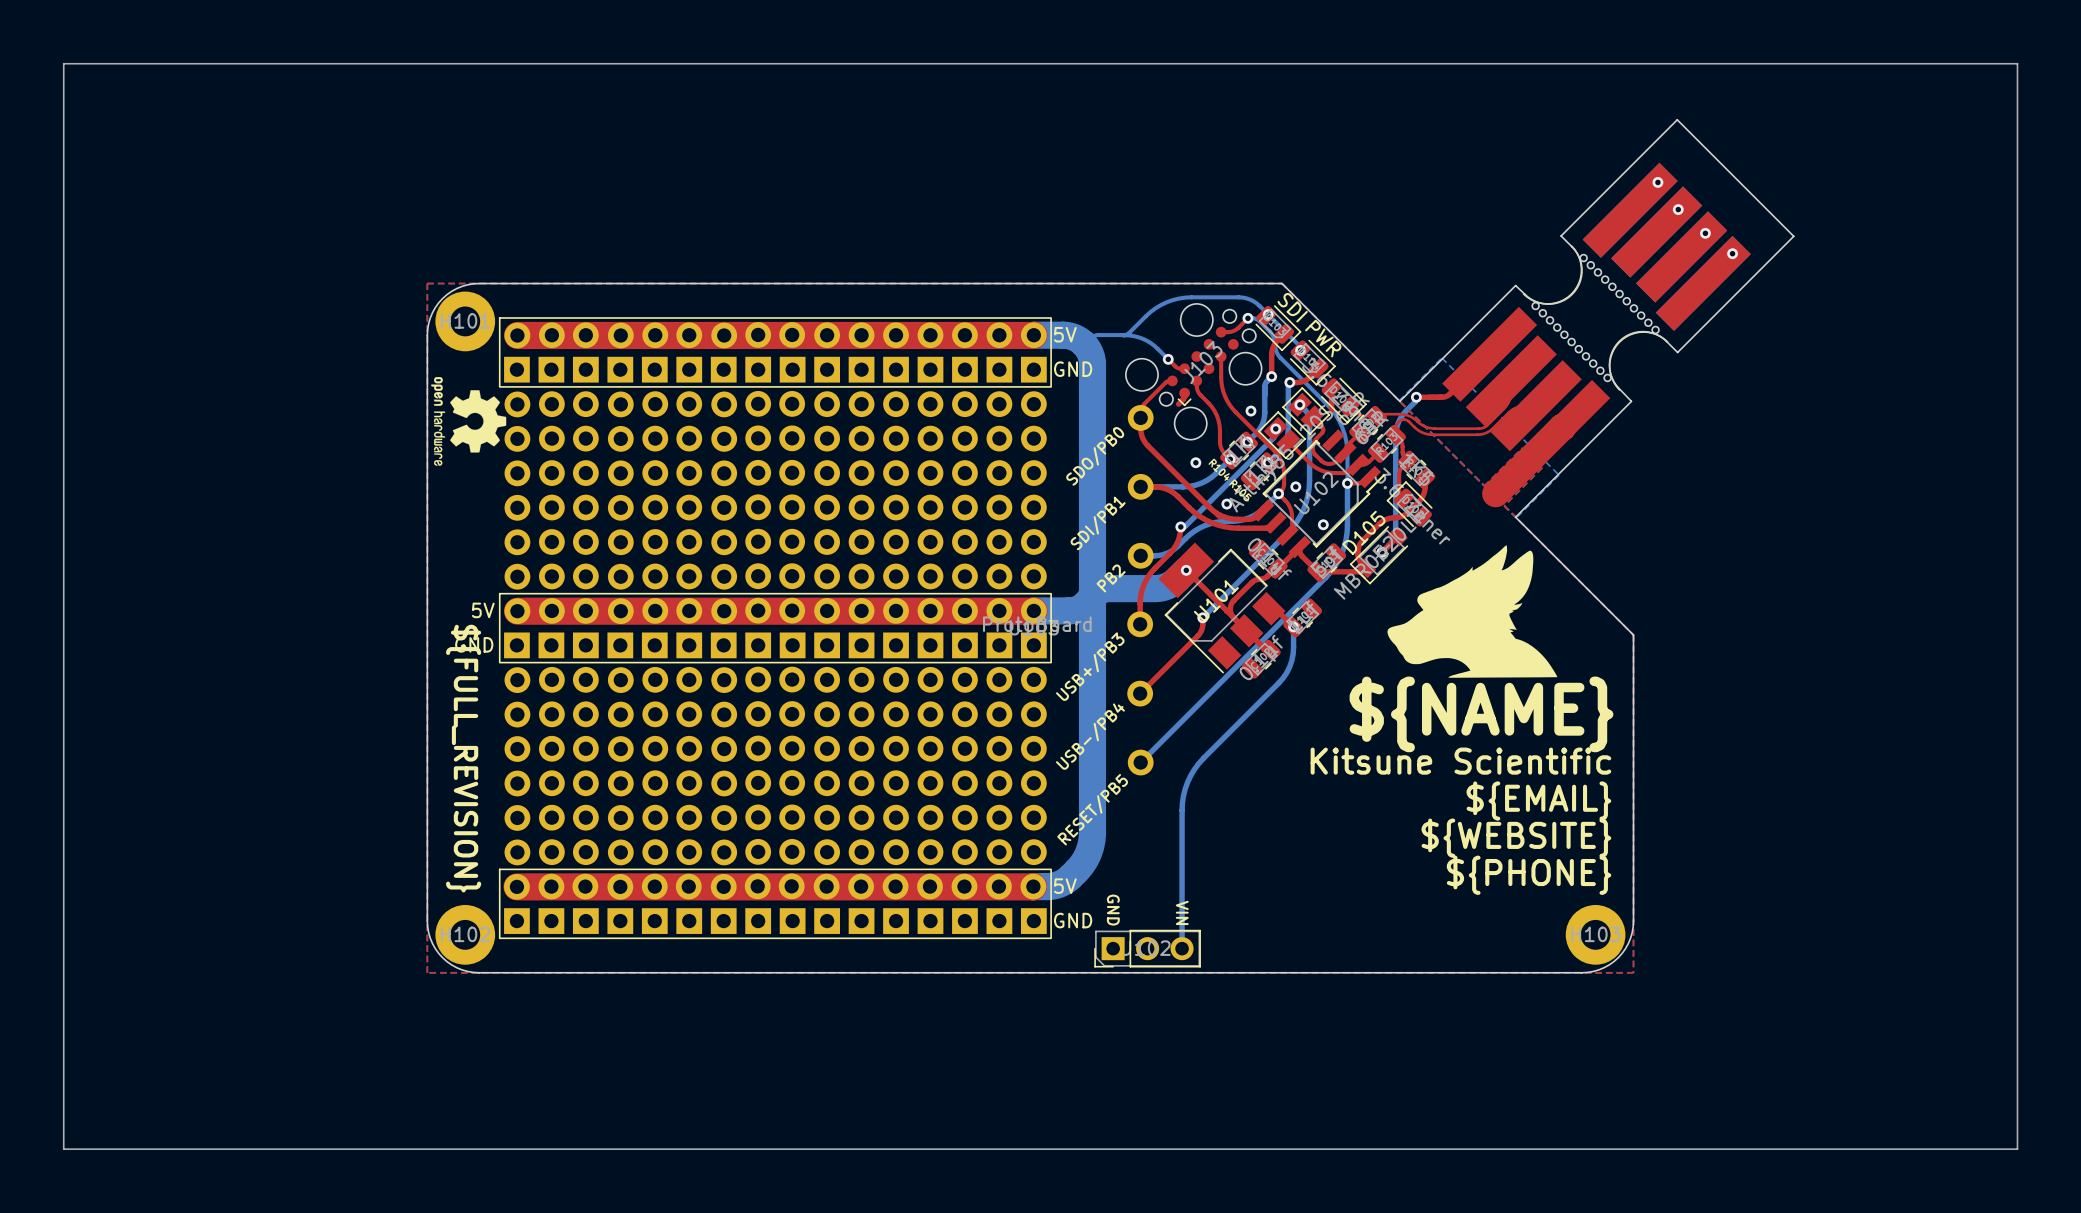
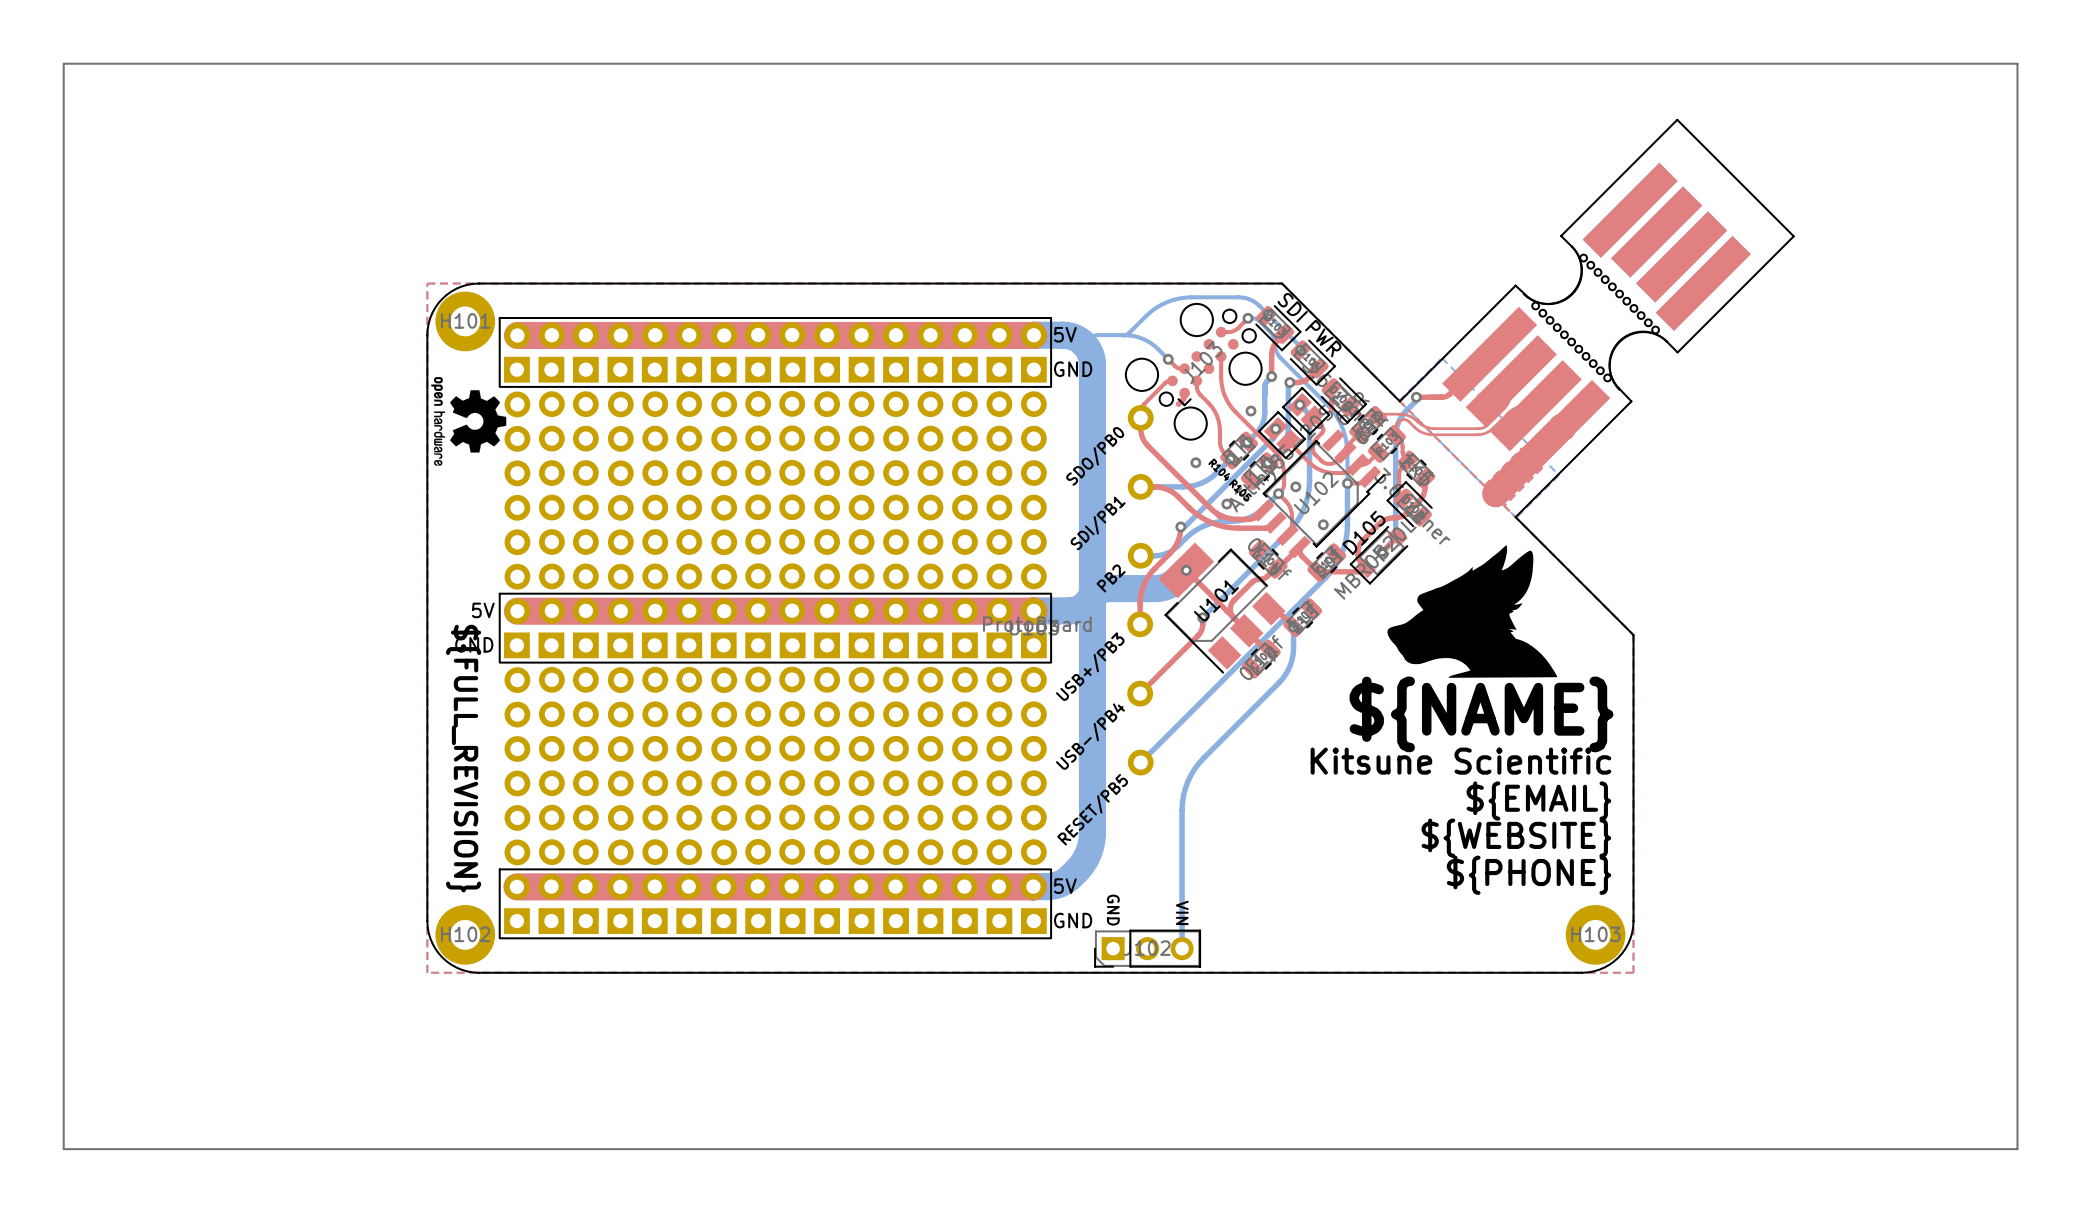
via: (1657, 182) -> none
via: (1678, 209) -> none
via: (1705, 233) -> none
via: (1732, 253) -> none

